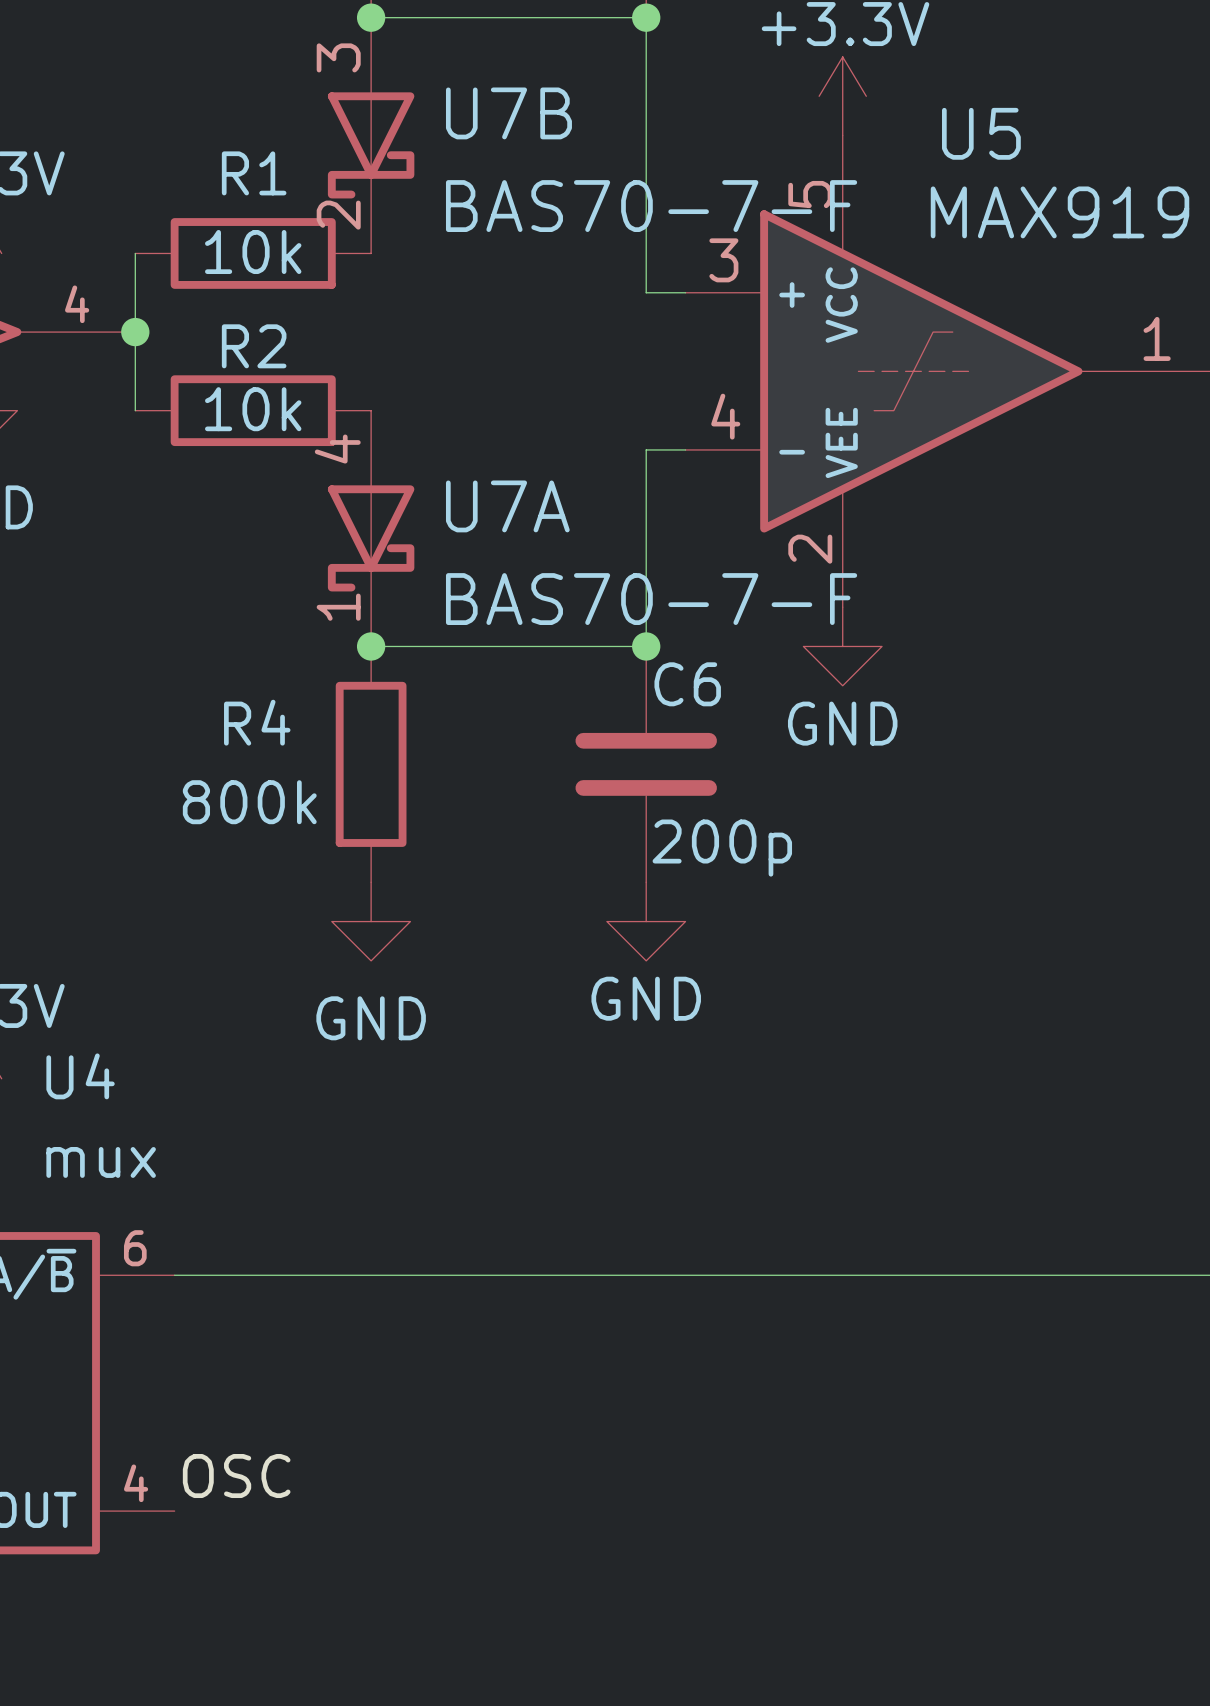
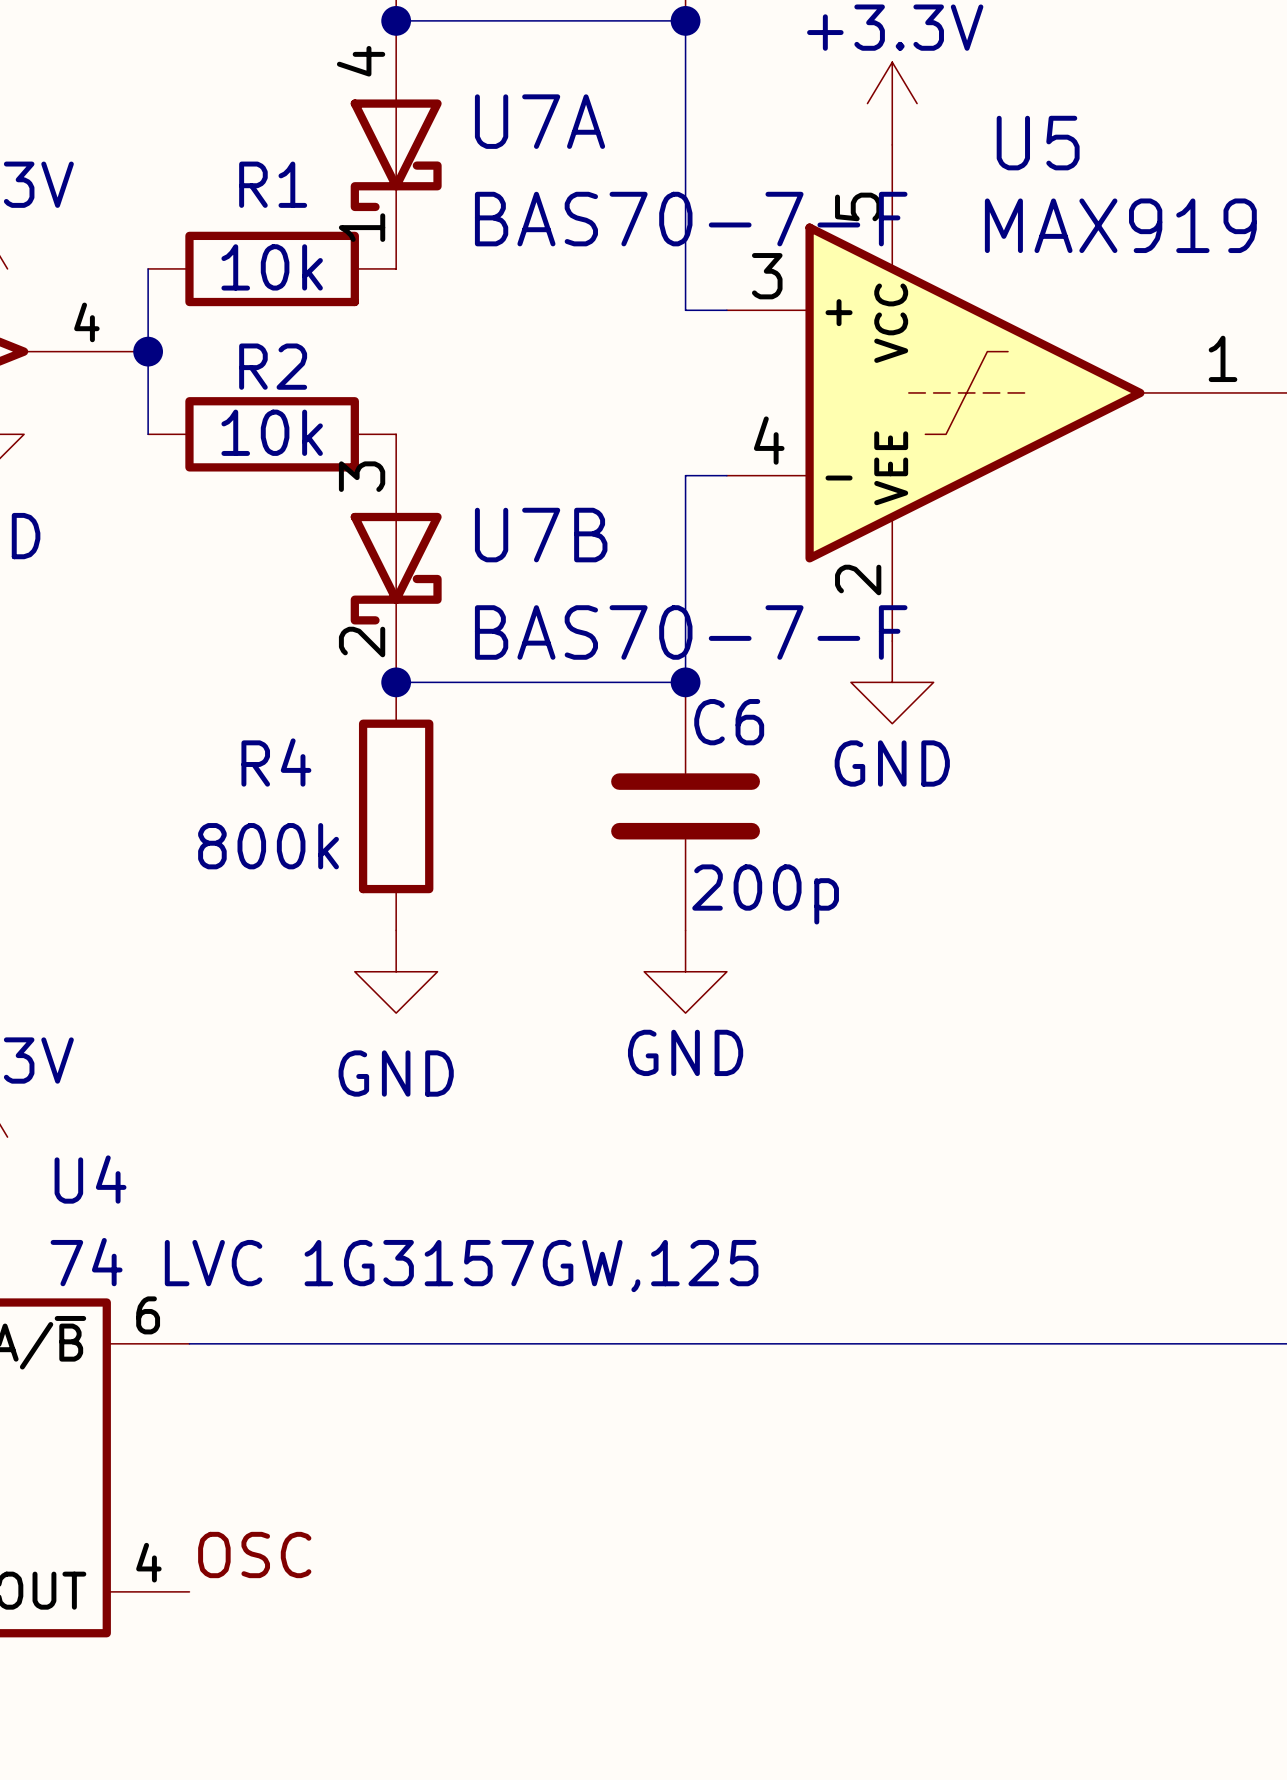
U7B position: (371, 135) -> (396, 558)
U7A position: (371, 528) -> (396, 144)
U4 name position: U4 (80, 1076) -> U4 (90, 1179)
U4 value: mux (101, 1162) -> 74 LVC 1G3157GW,125 (404, 1265)

